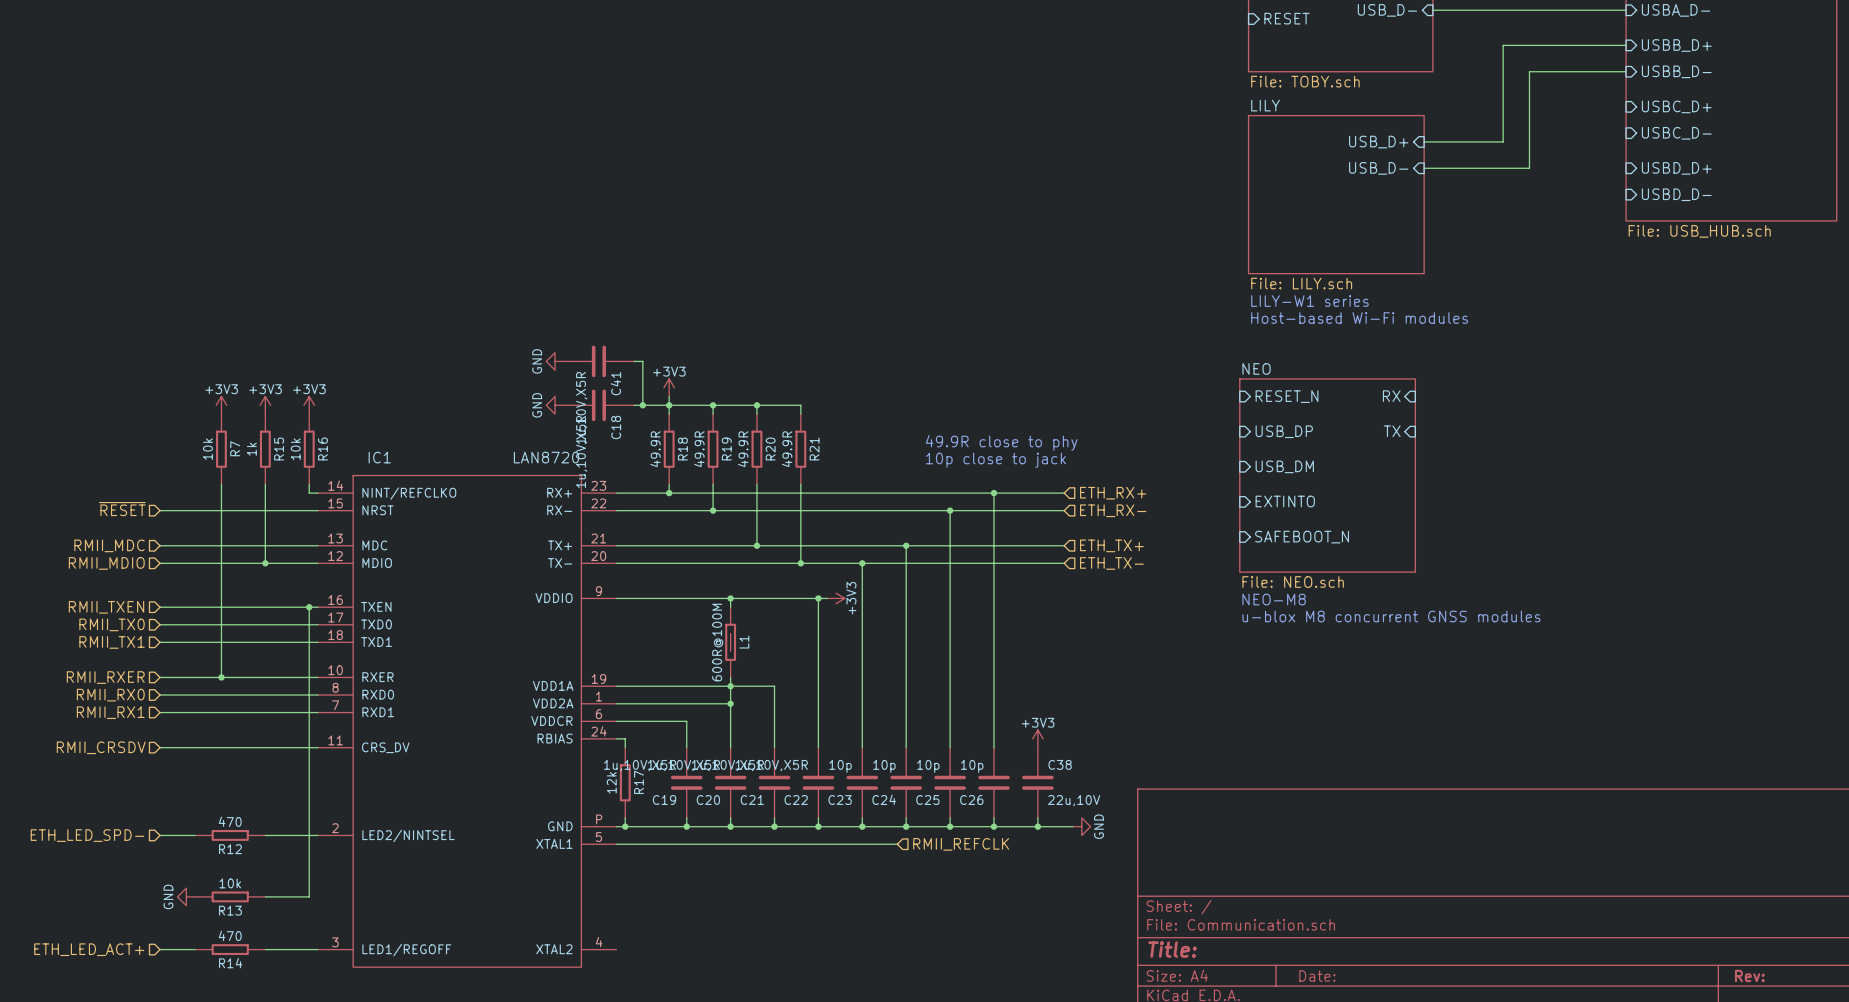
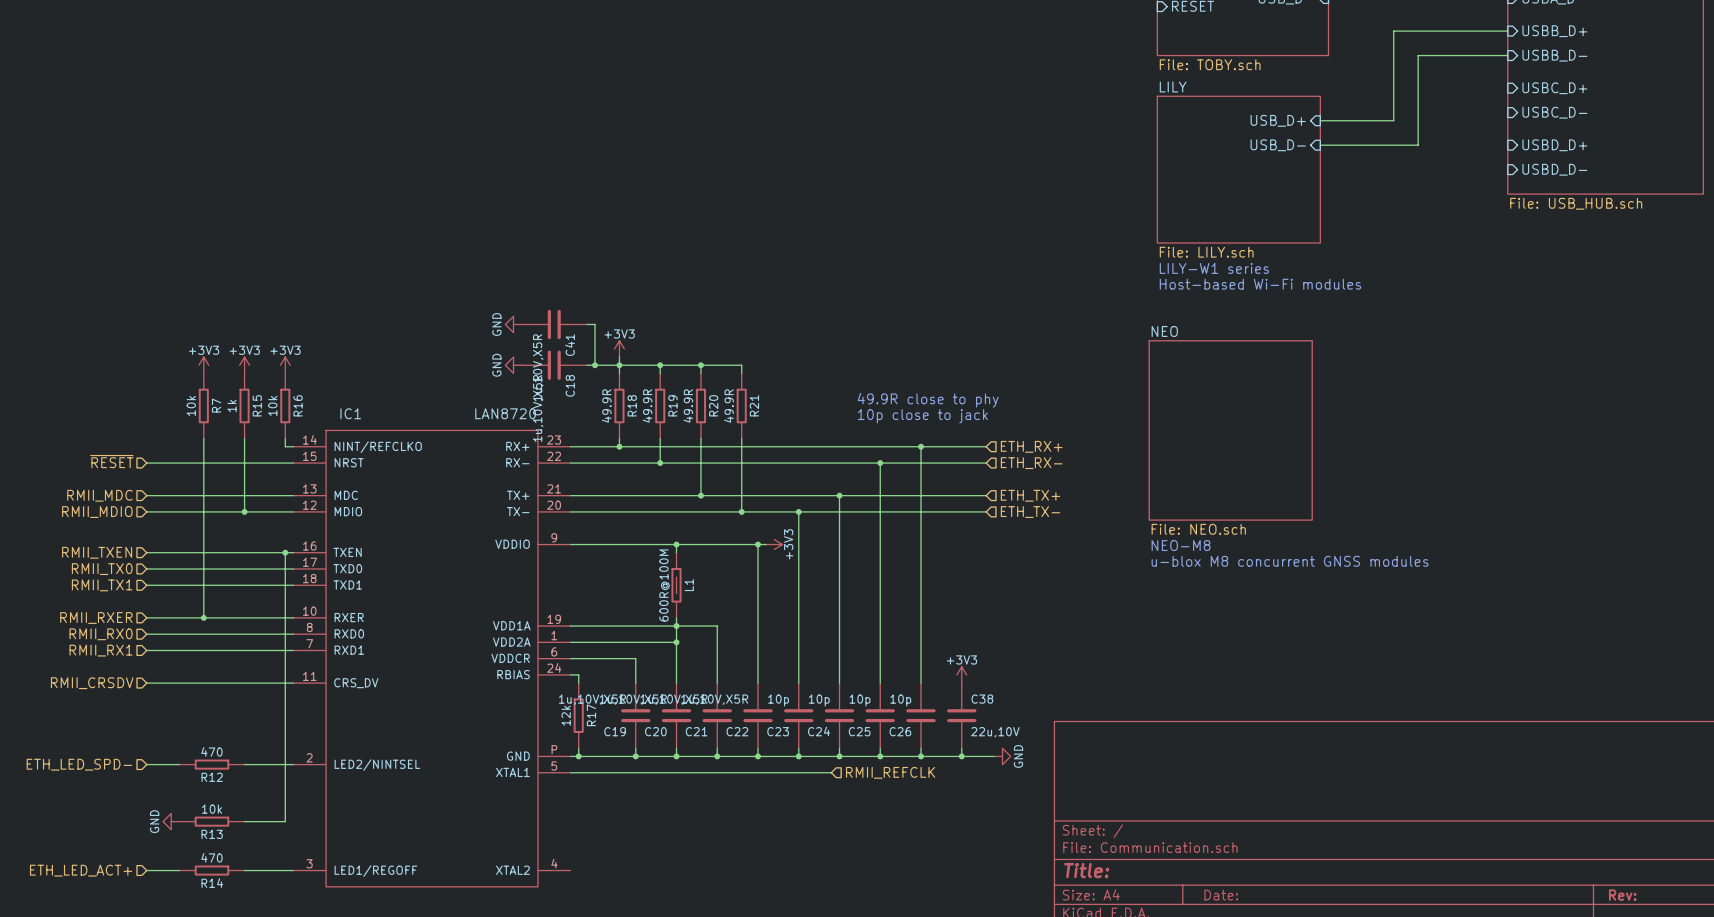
sheet pin: RESET_N (1287, 396) -> none
sheet pin: RX (1391, 396) -> none
sheet pin: USB_DP (1284, 431) -> none
sheet pin: TX (1392, 431) -> none
sheet pin: USB_DM (1284, 466) -> none
sheet pin: EXTINTO (1285, 501) -> none
sheet pin: SAFEBOOT_N (1302, 537) -> none

